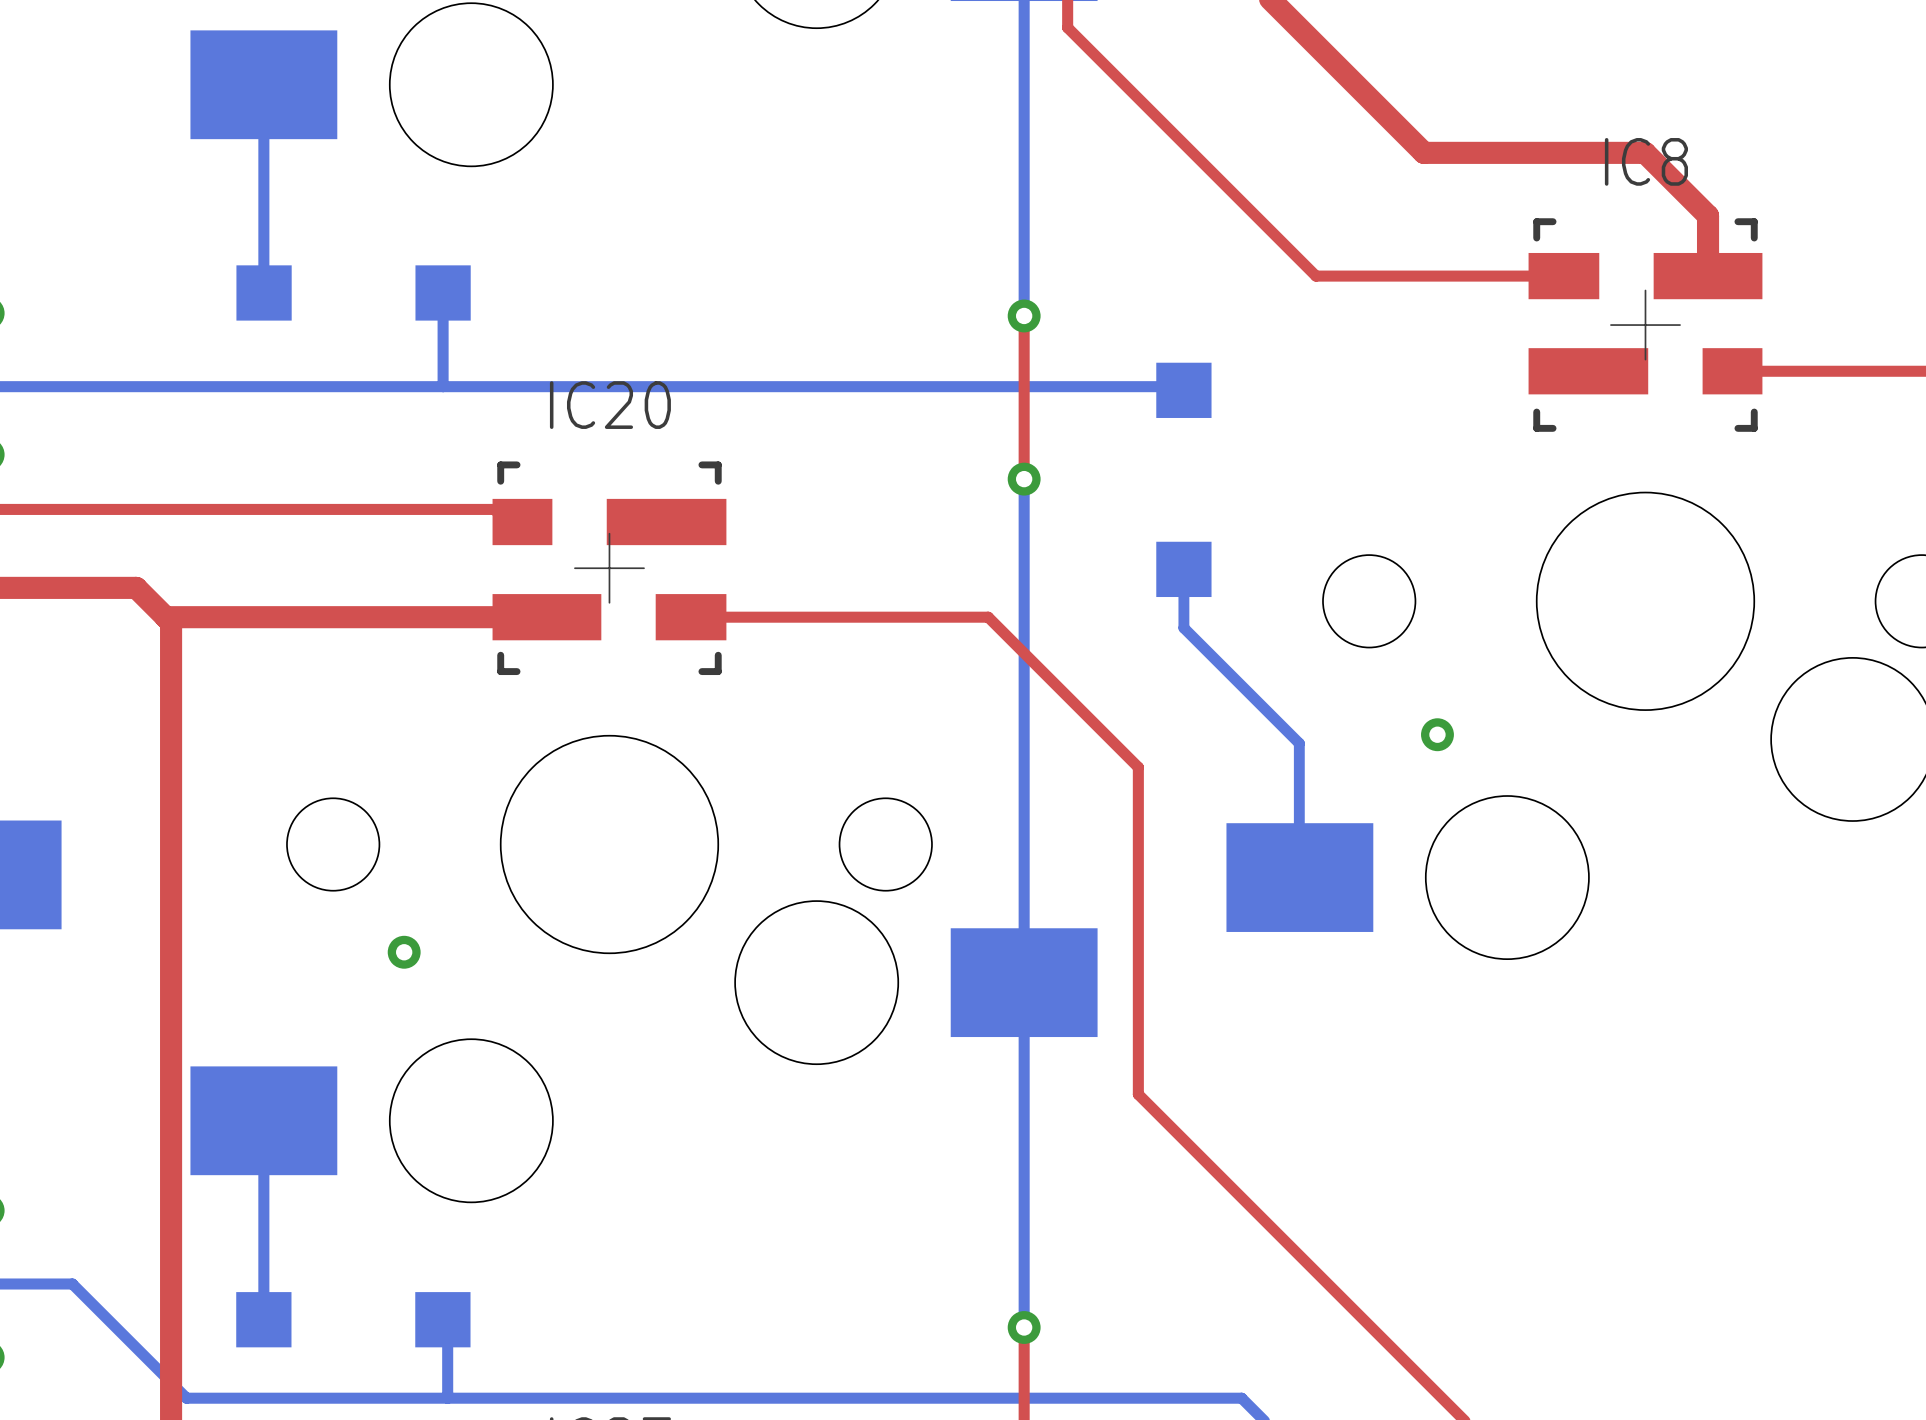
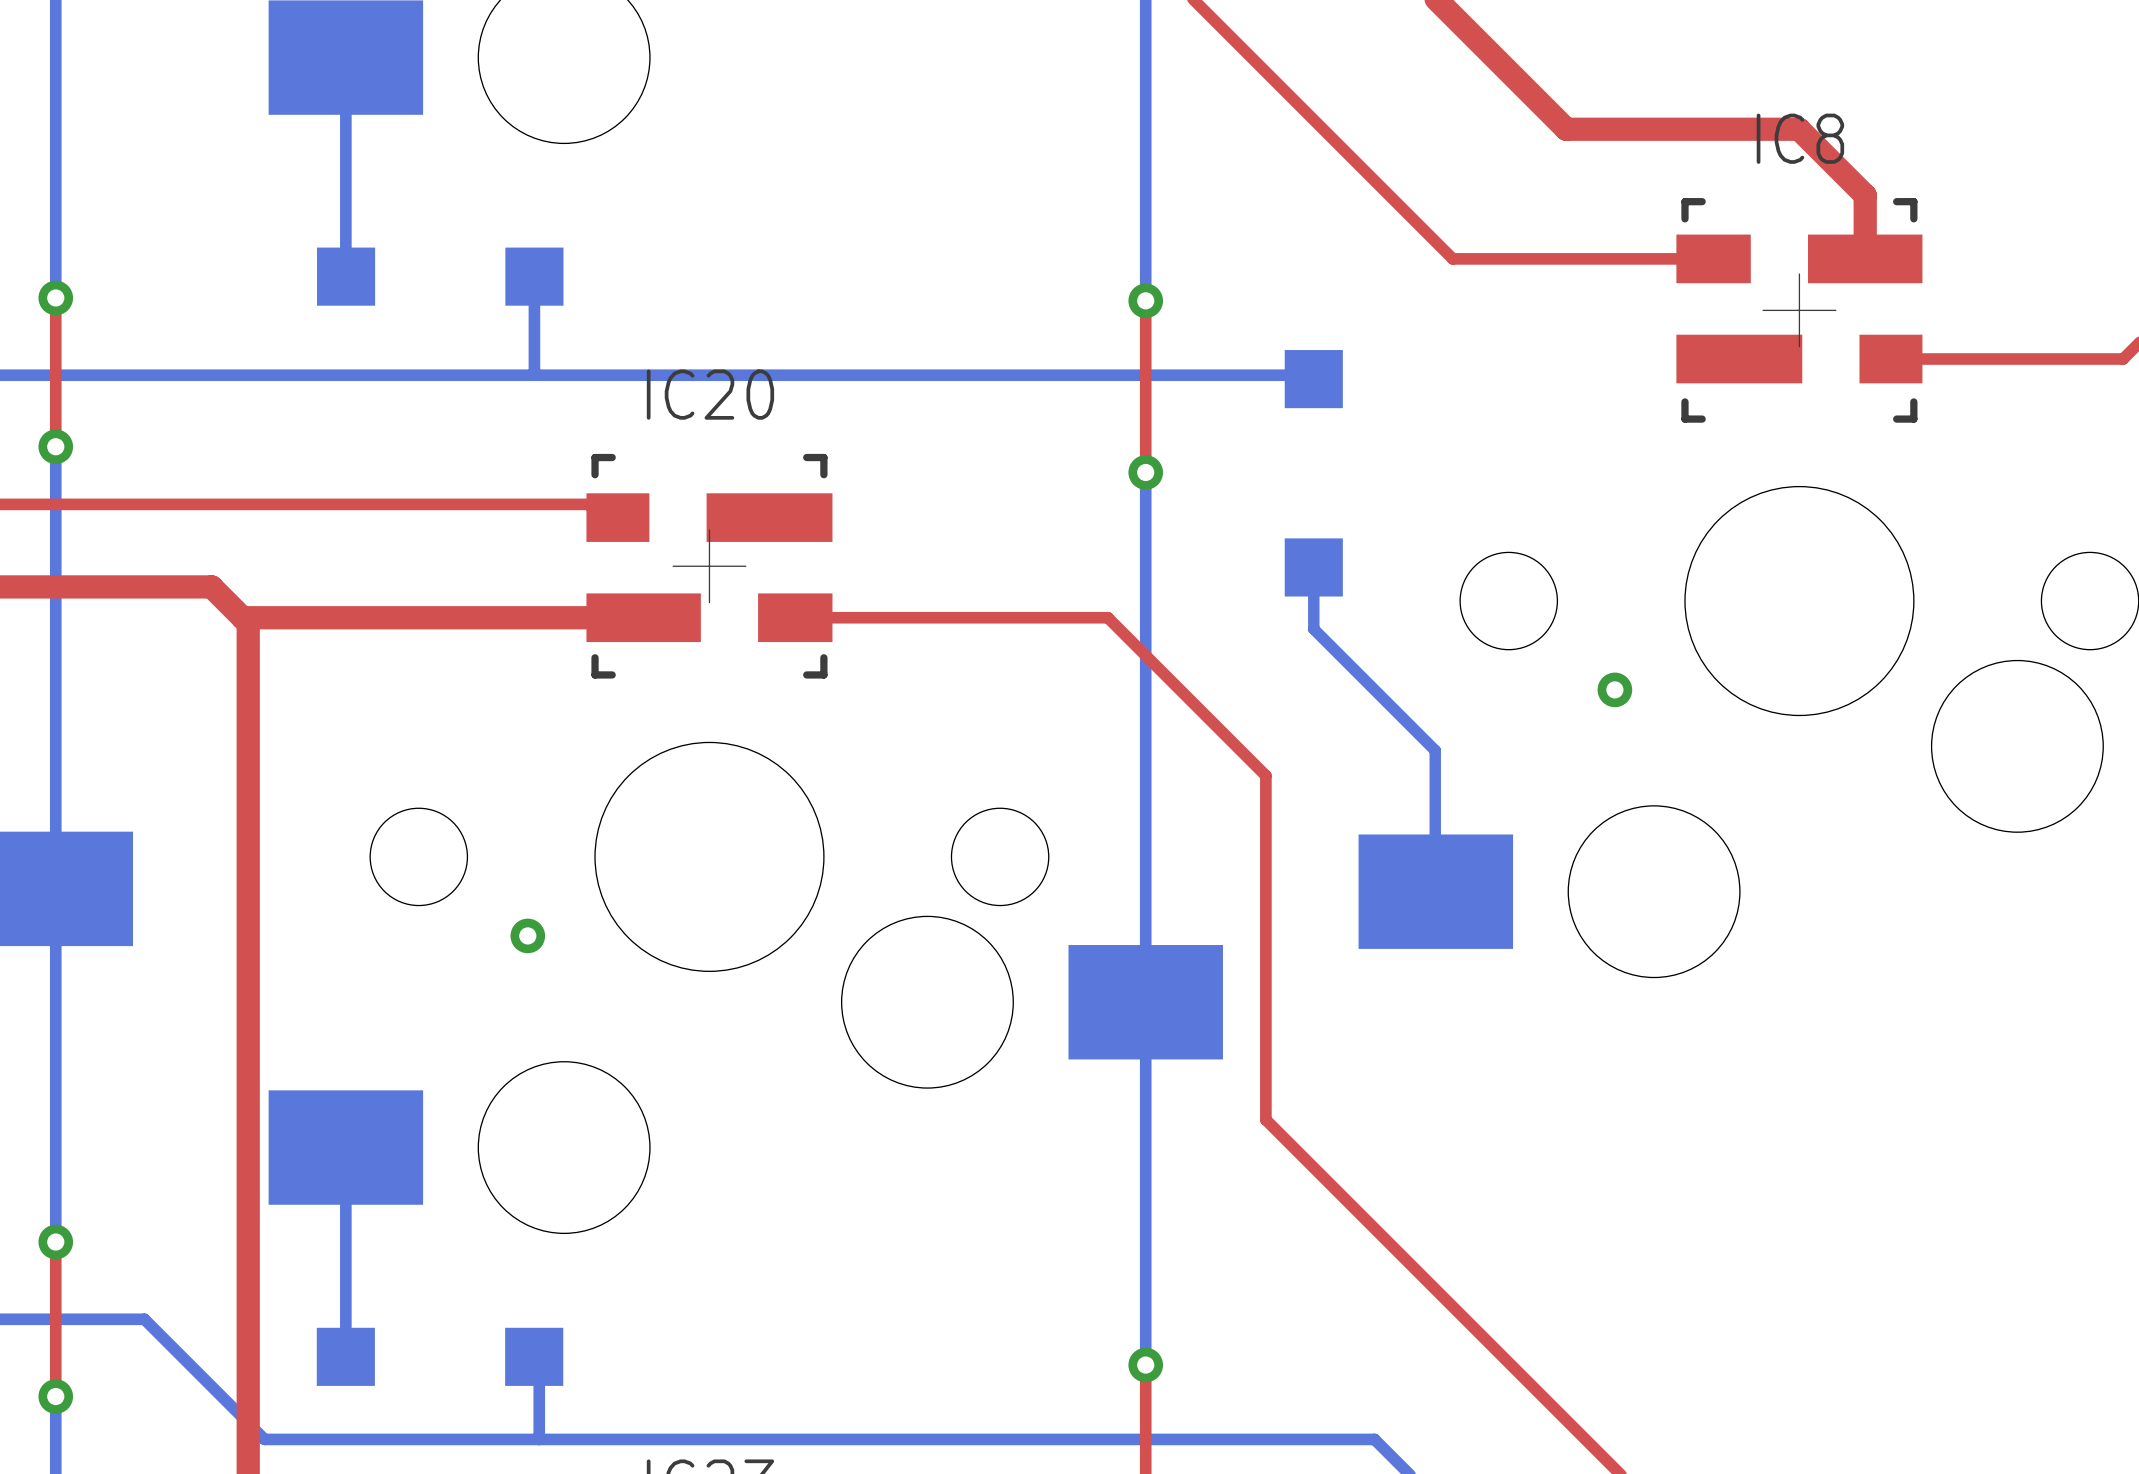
via position: (1437, 734) -> (1614, 689)
via position: (404, 952) -> (527, 935)

